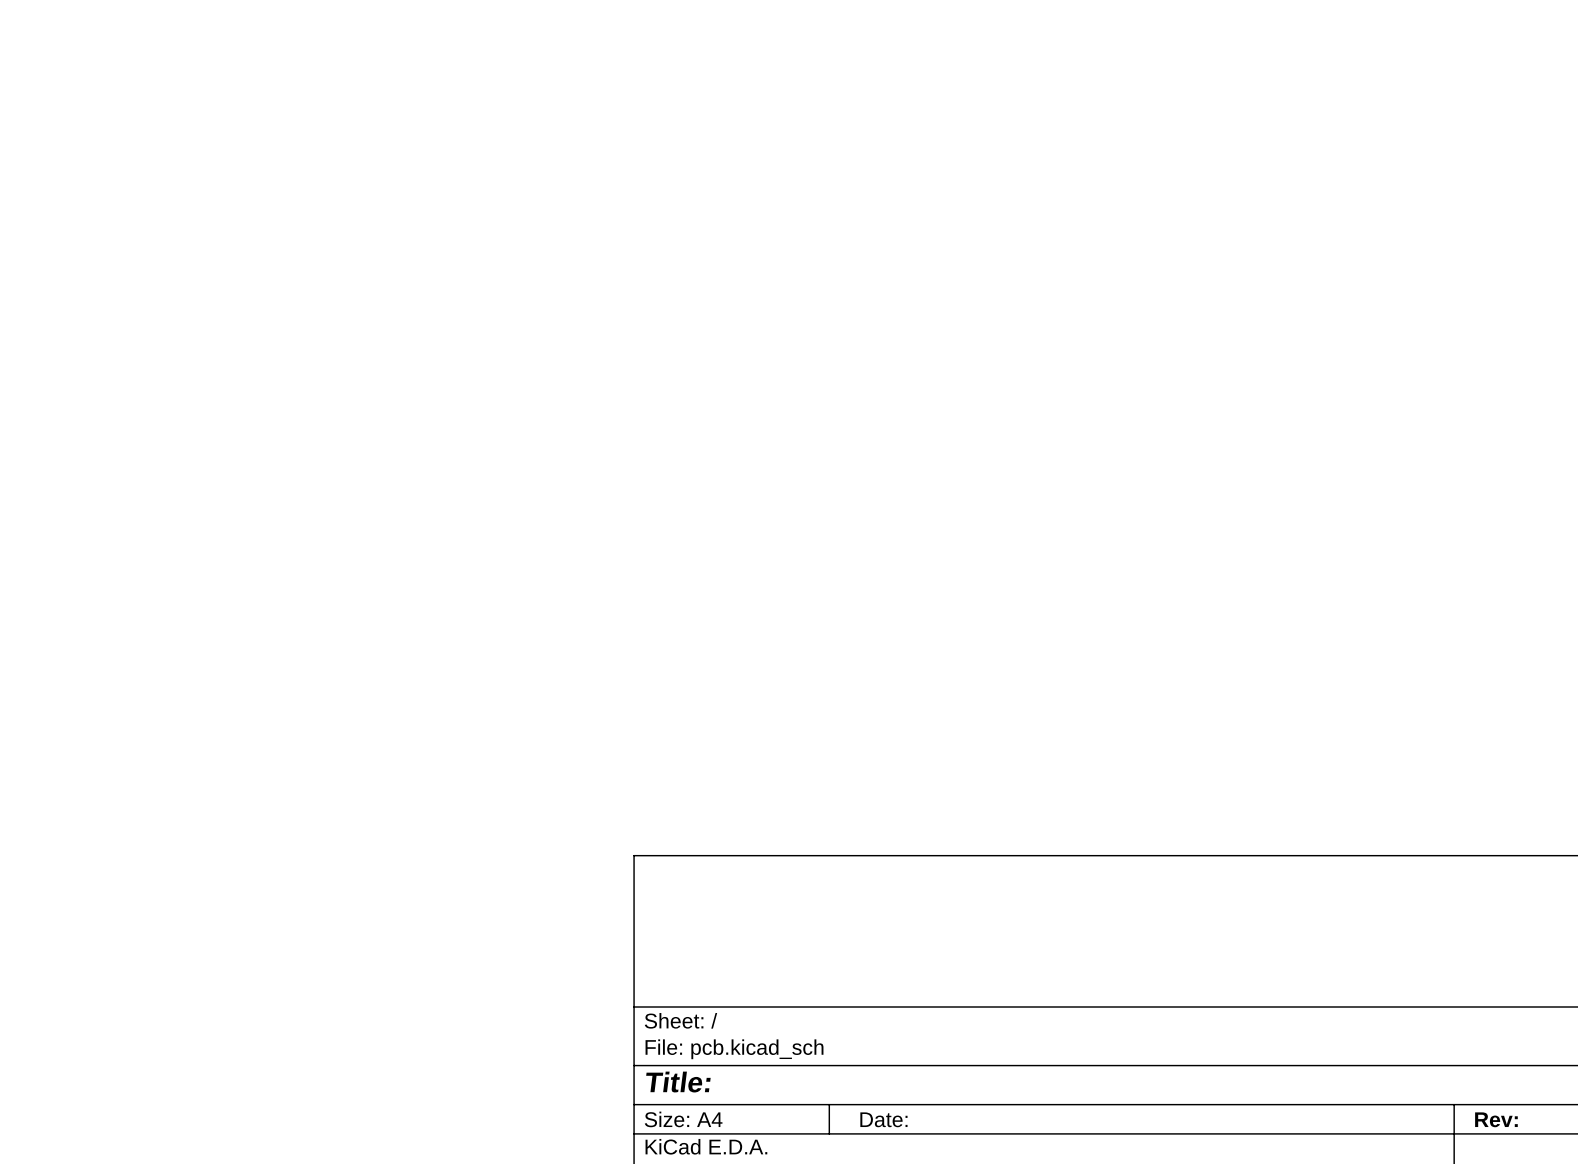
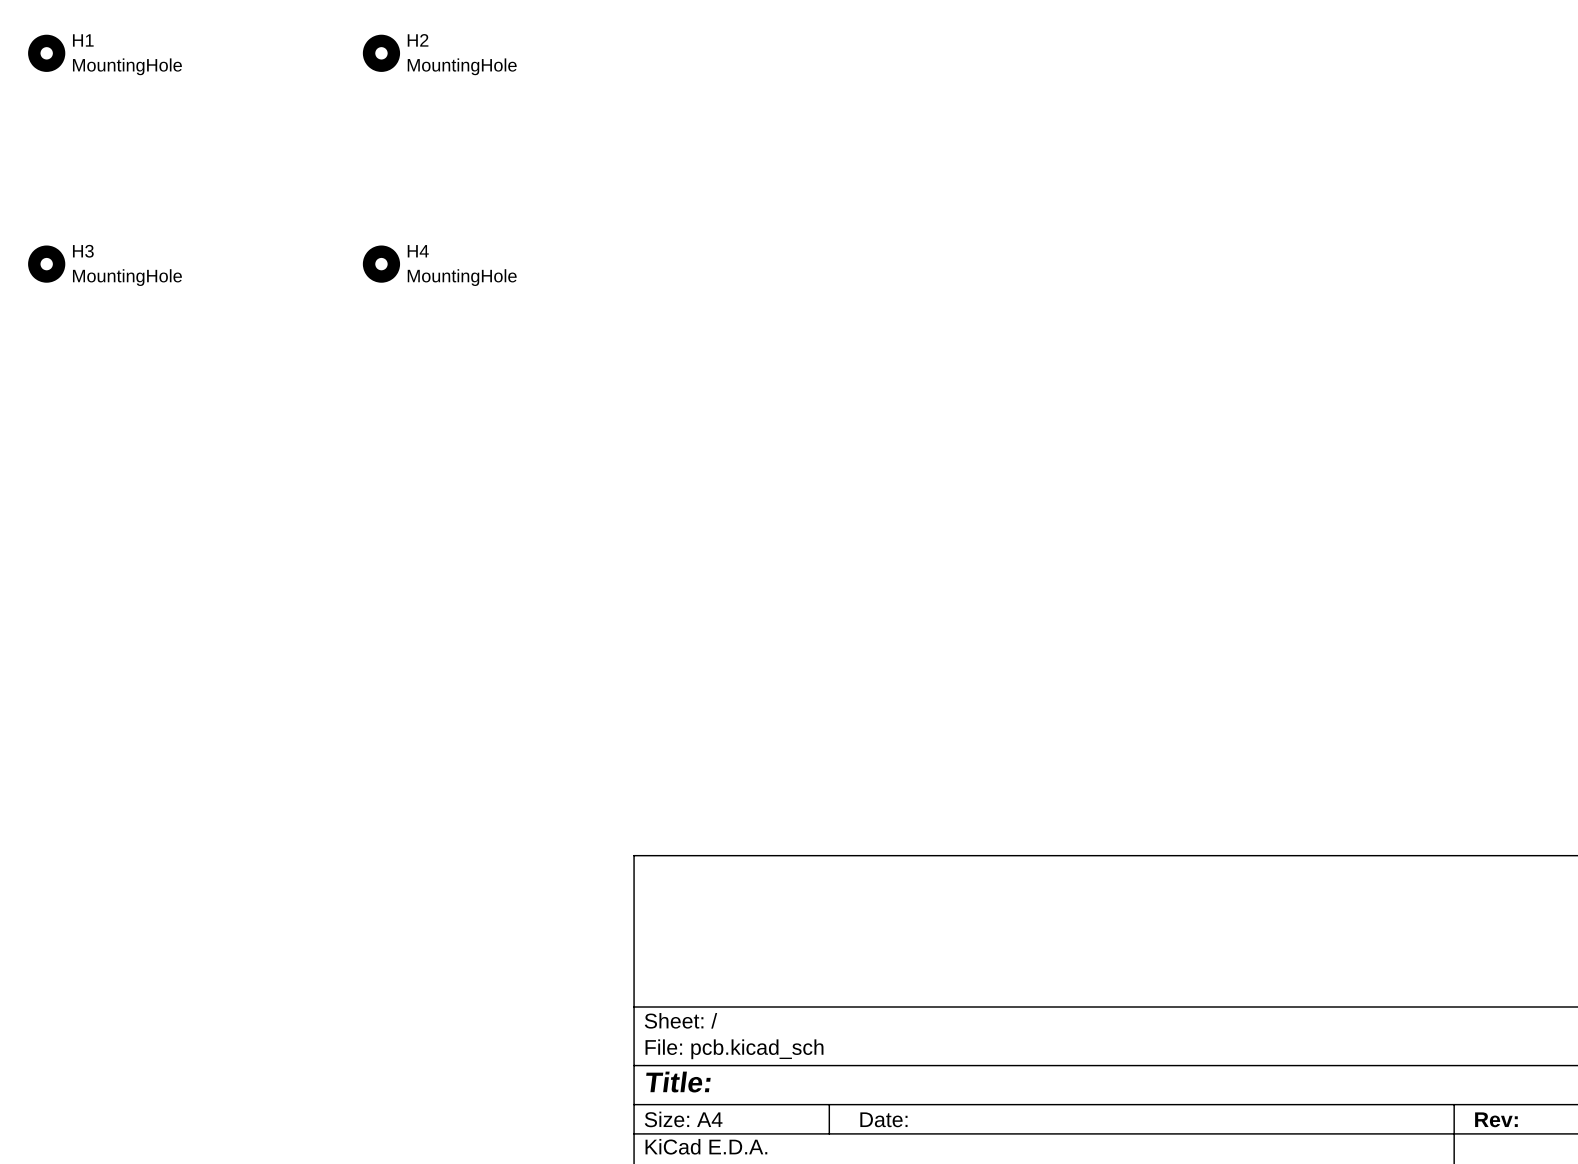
H1: none -> MountingHole (46, 53)
H2: none -> MountingHole (381, 53)
H3: none -> MountingHole (46, 264)
H4: none -> MountingHole (381, 264)

